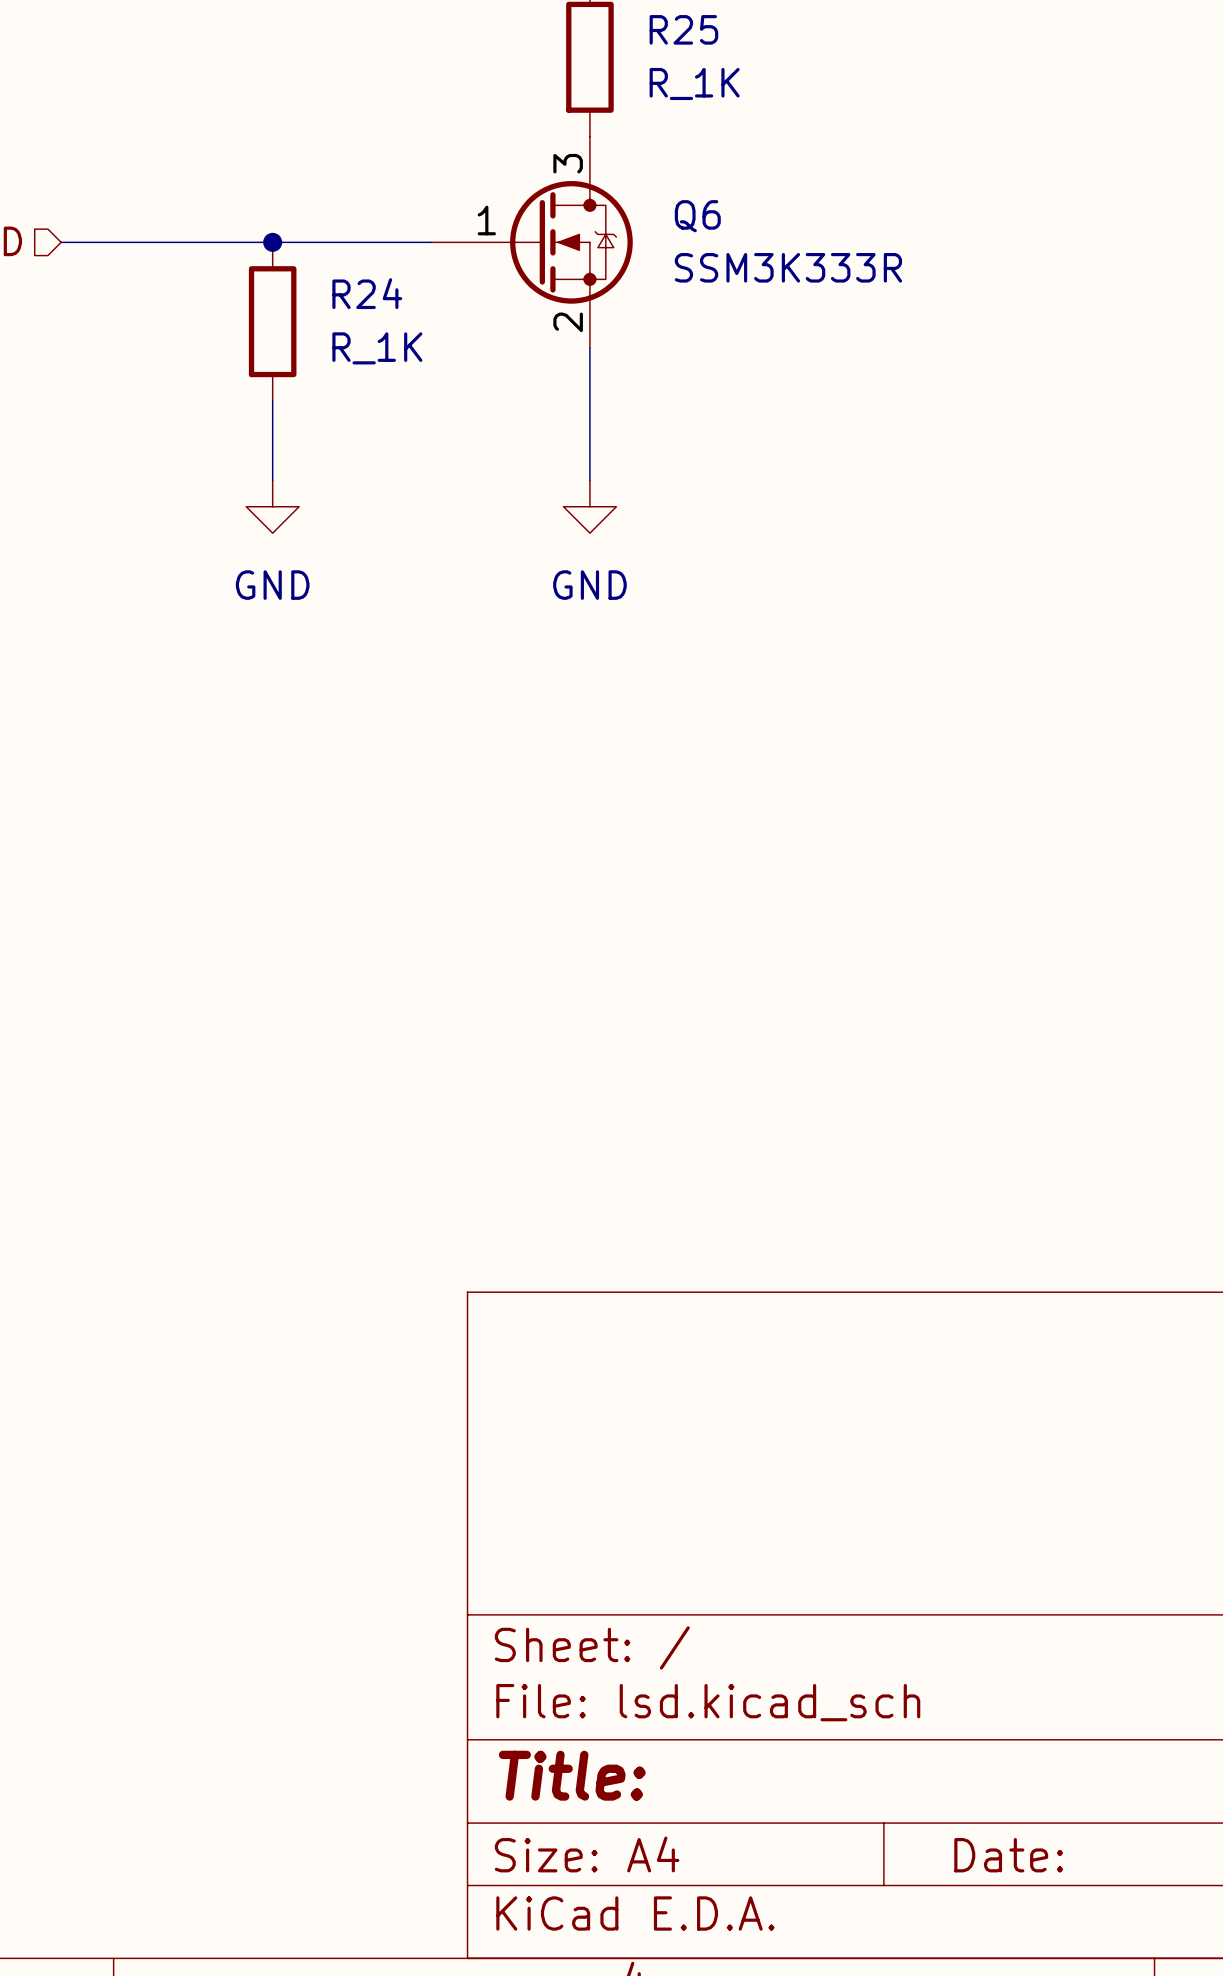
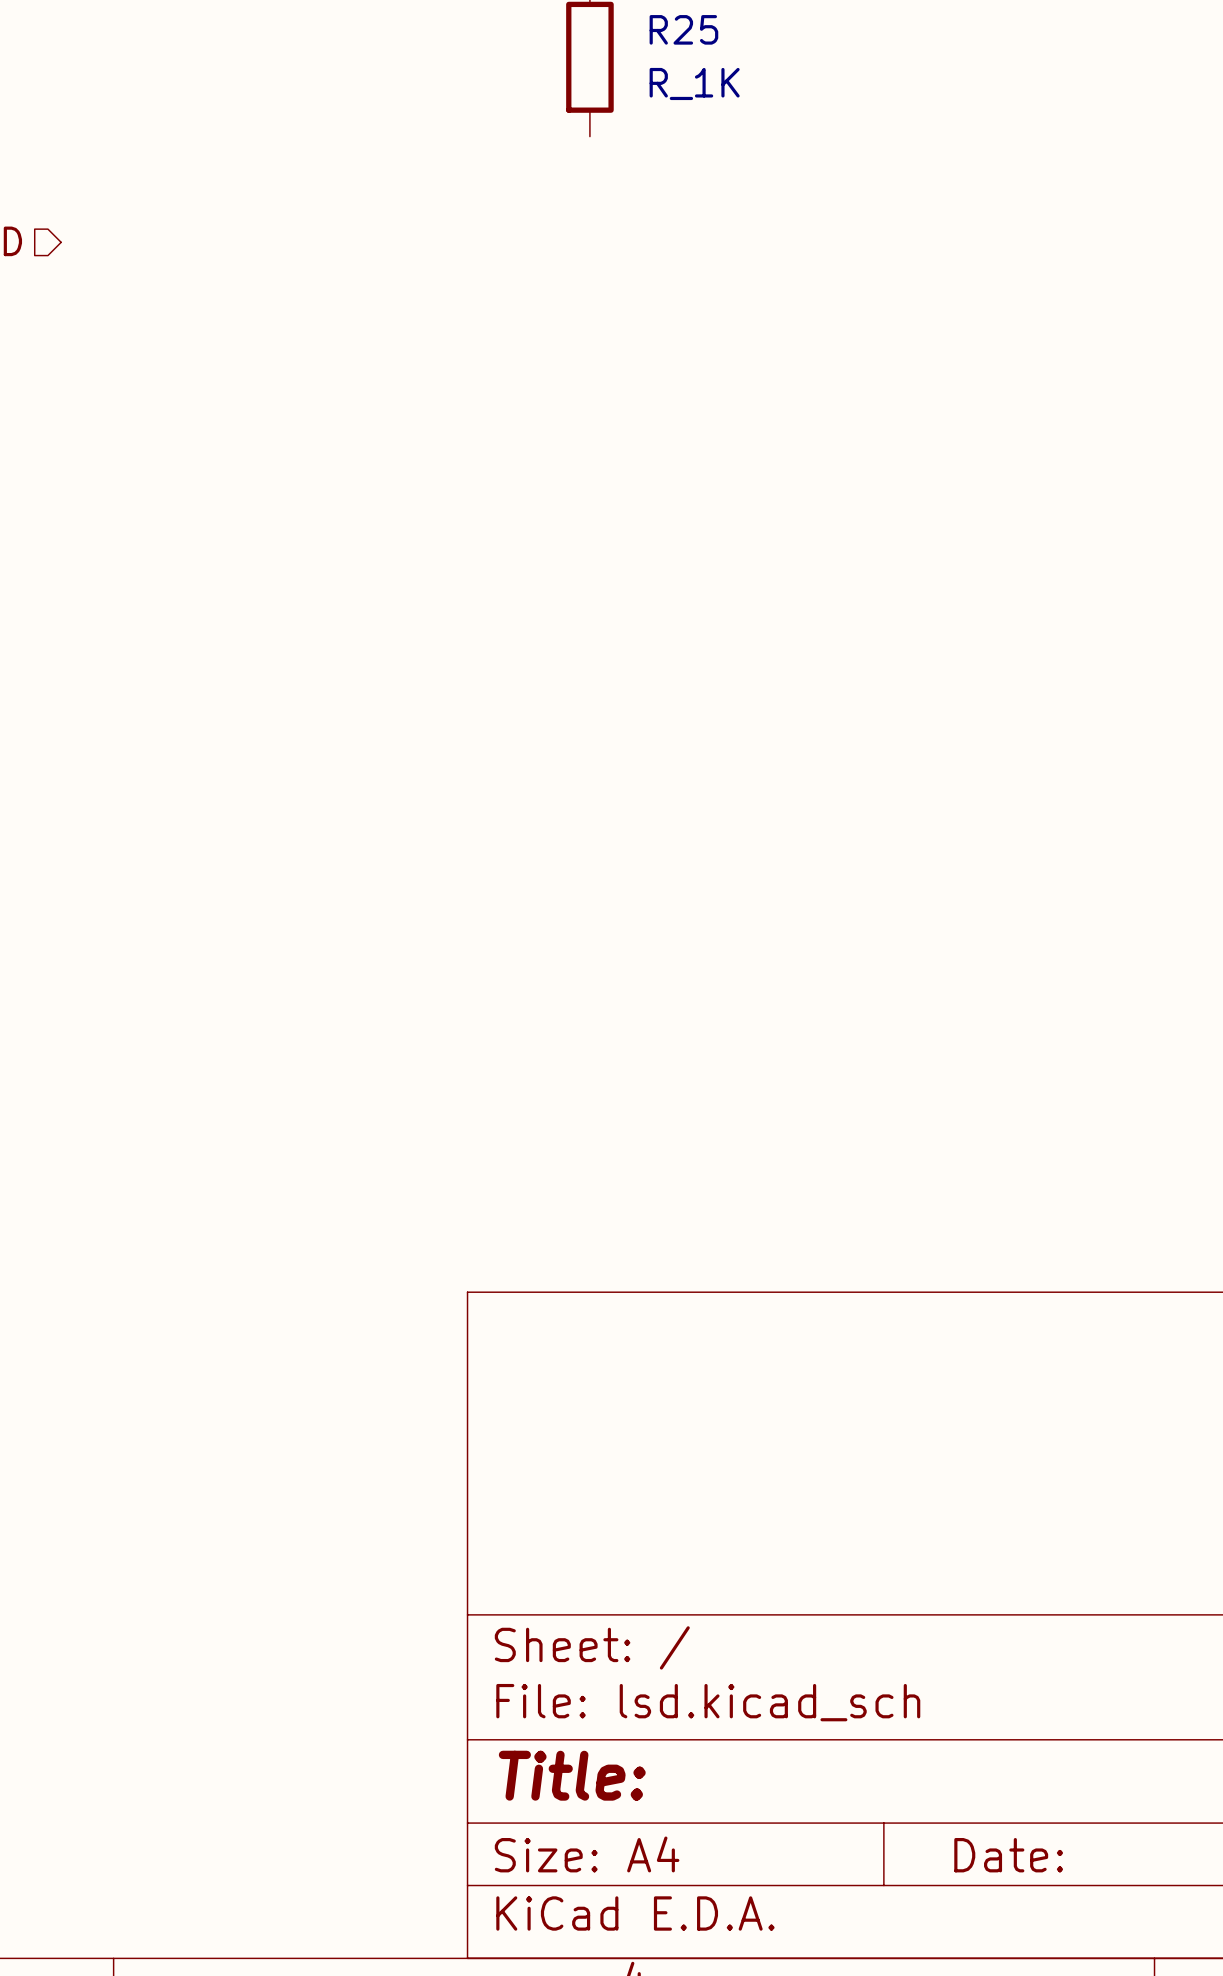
wire: (61, 242) (431, 242) -> none
junction: (272, 242) -> none
Q6: SSM3K333R (532, 242) -> none
R24: R_1K (272, 321) -> none
wire: (589, 348) (589, 480) -> none
wire: (272, 400) (272, 480) -> none
power symbol: GND (272, 506) -> none
power symbol: GND (589, 506) -> none

